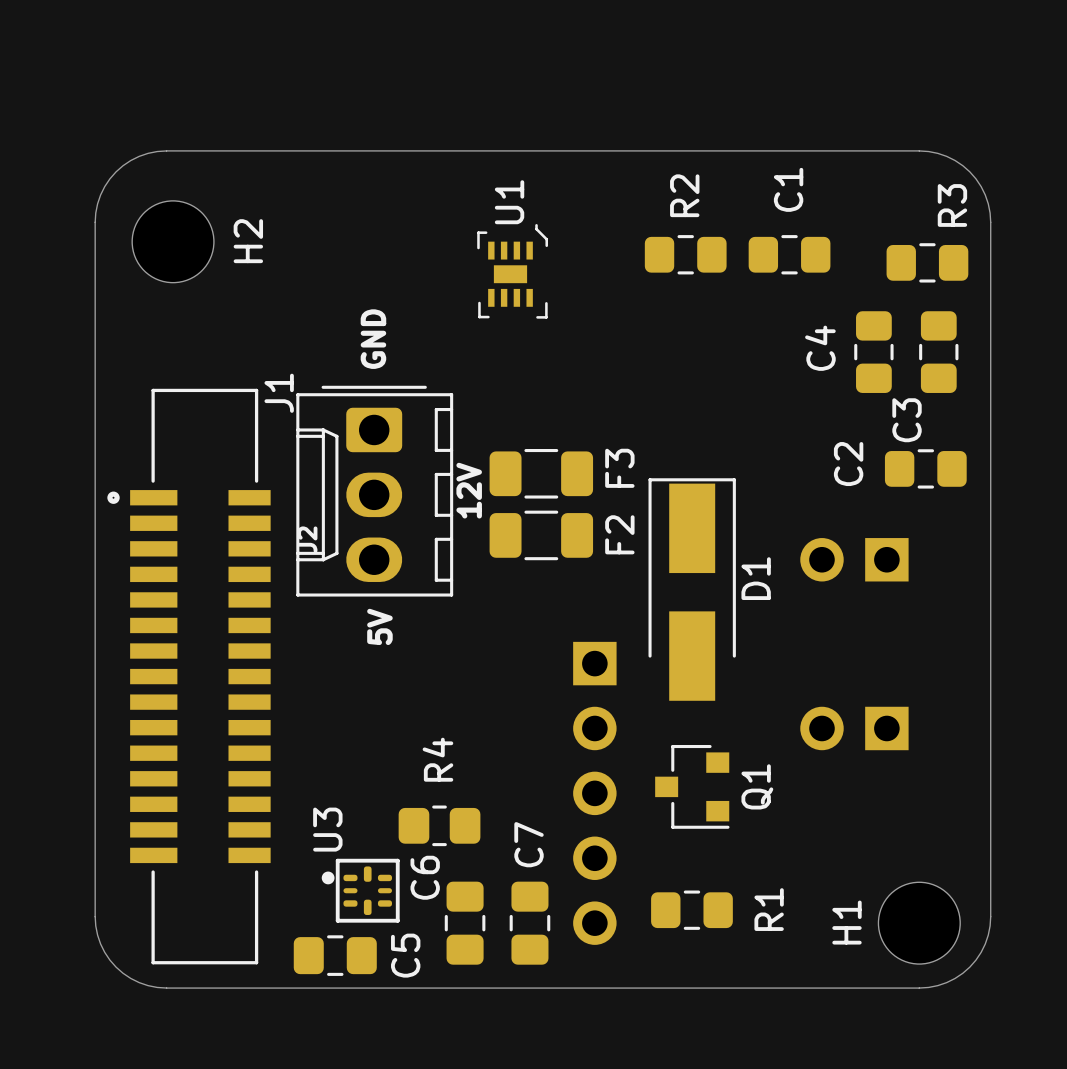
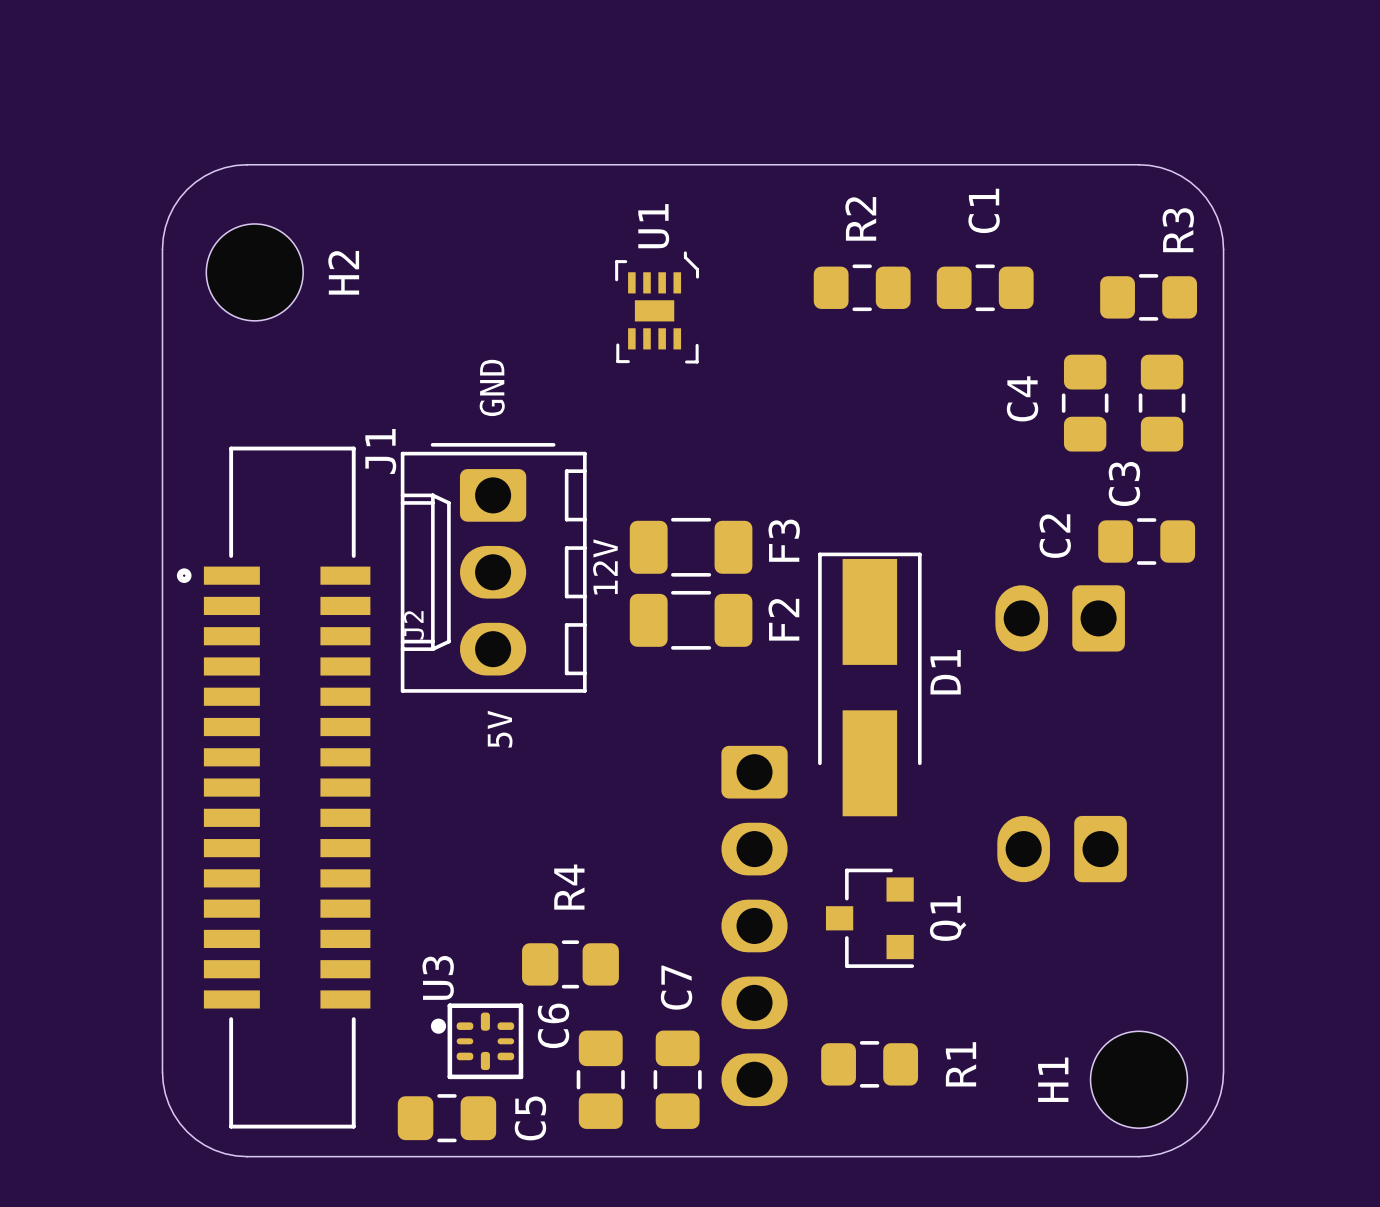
part: none -> (1060, 618)
part: (854, 559) -> none
part footprint: [573, 641, 617, 945] -> [721, 745, 788, 1107]
part footprint: [800, 706, 909, 751] -> [997, 815, 1127, 883]

